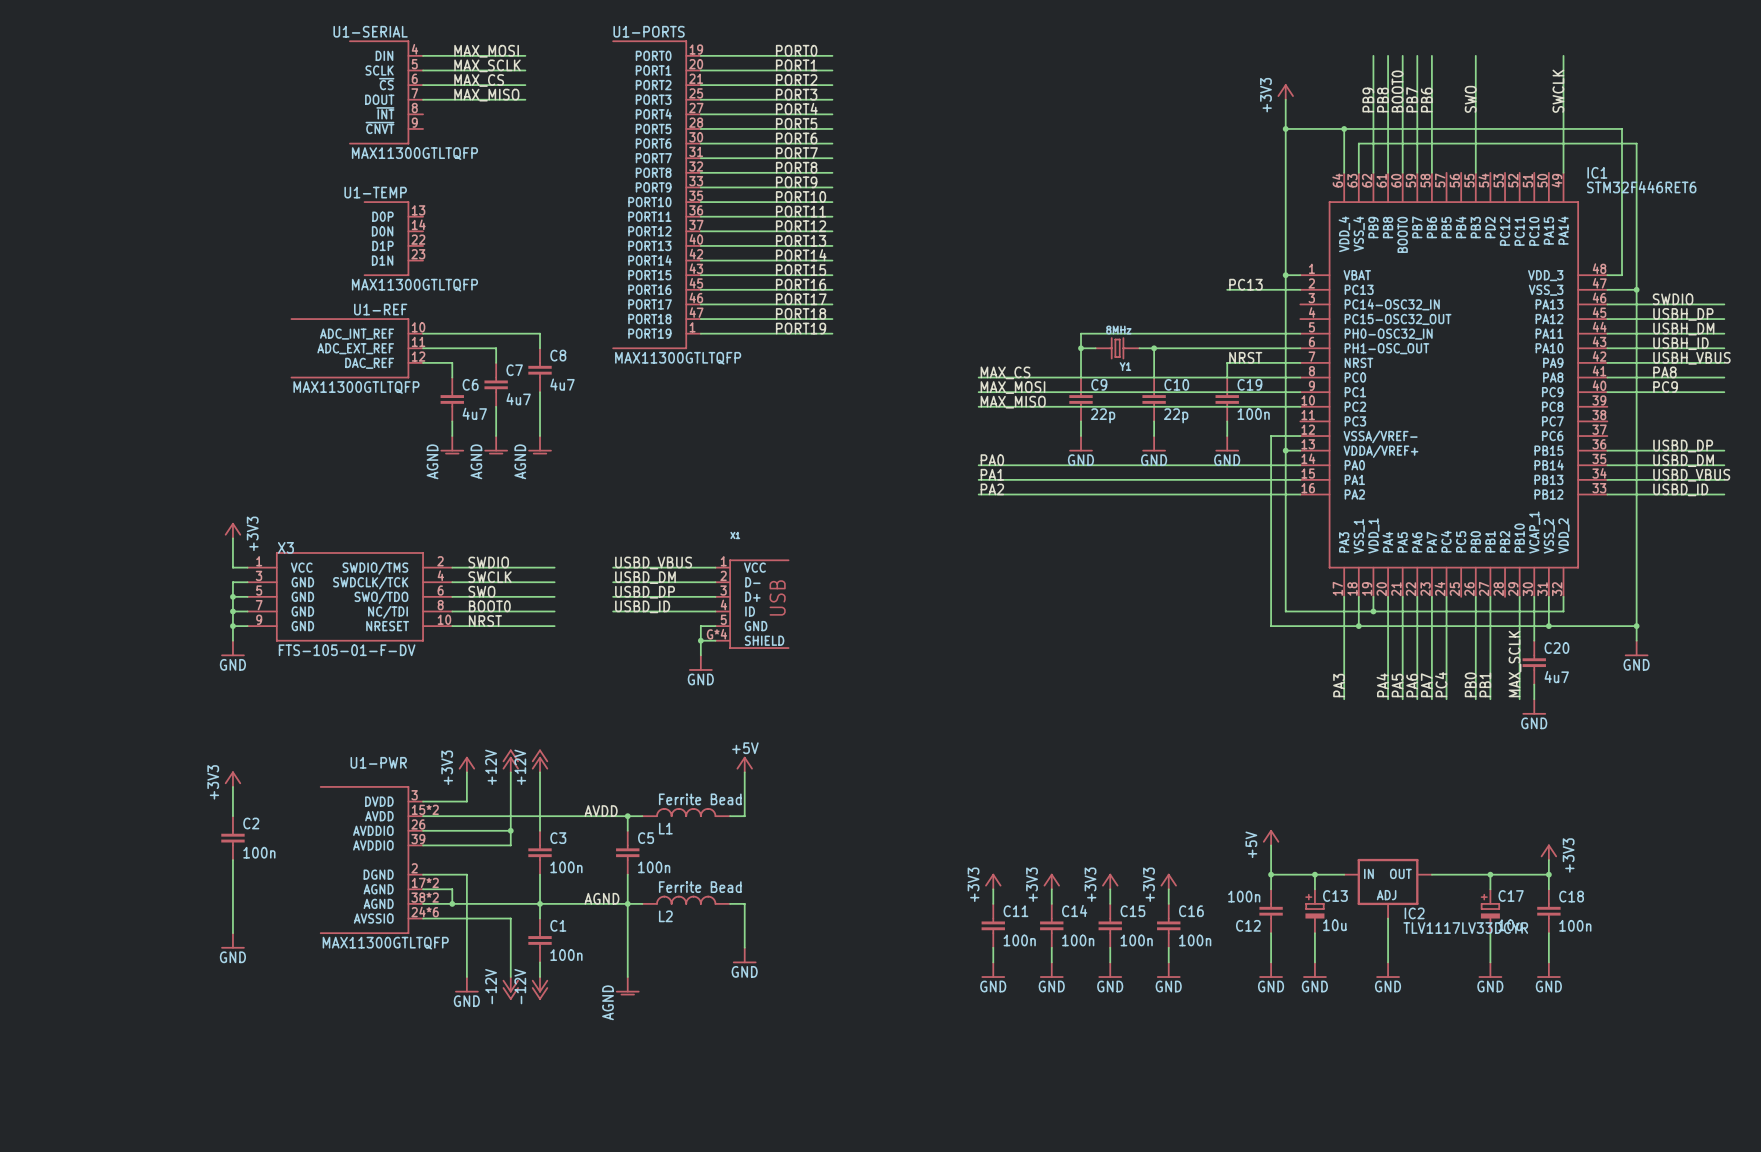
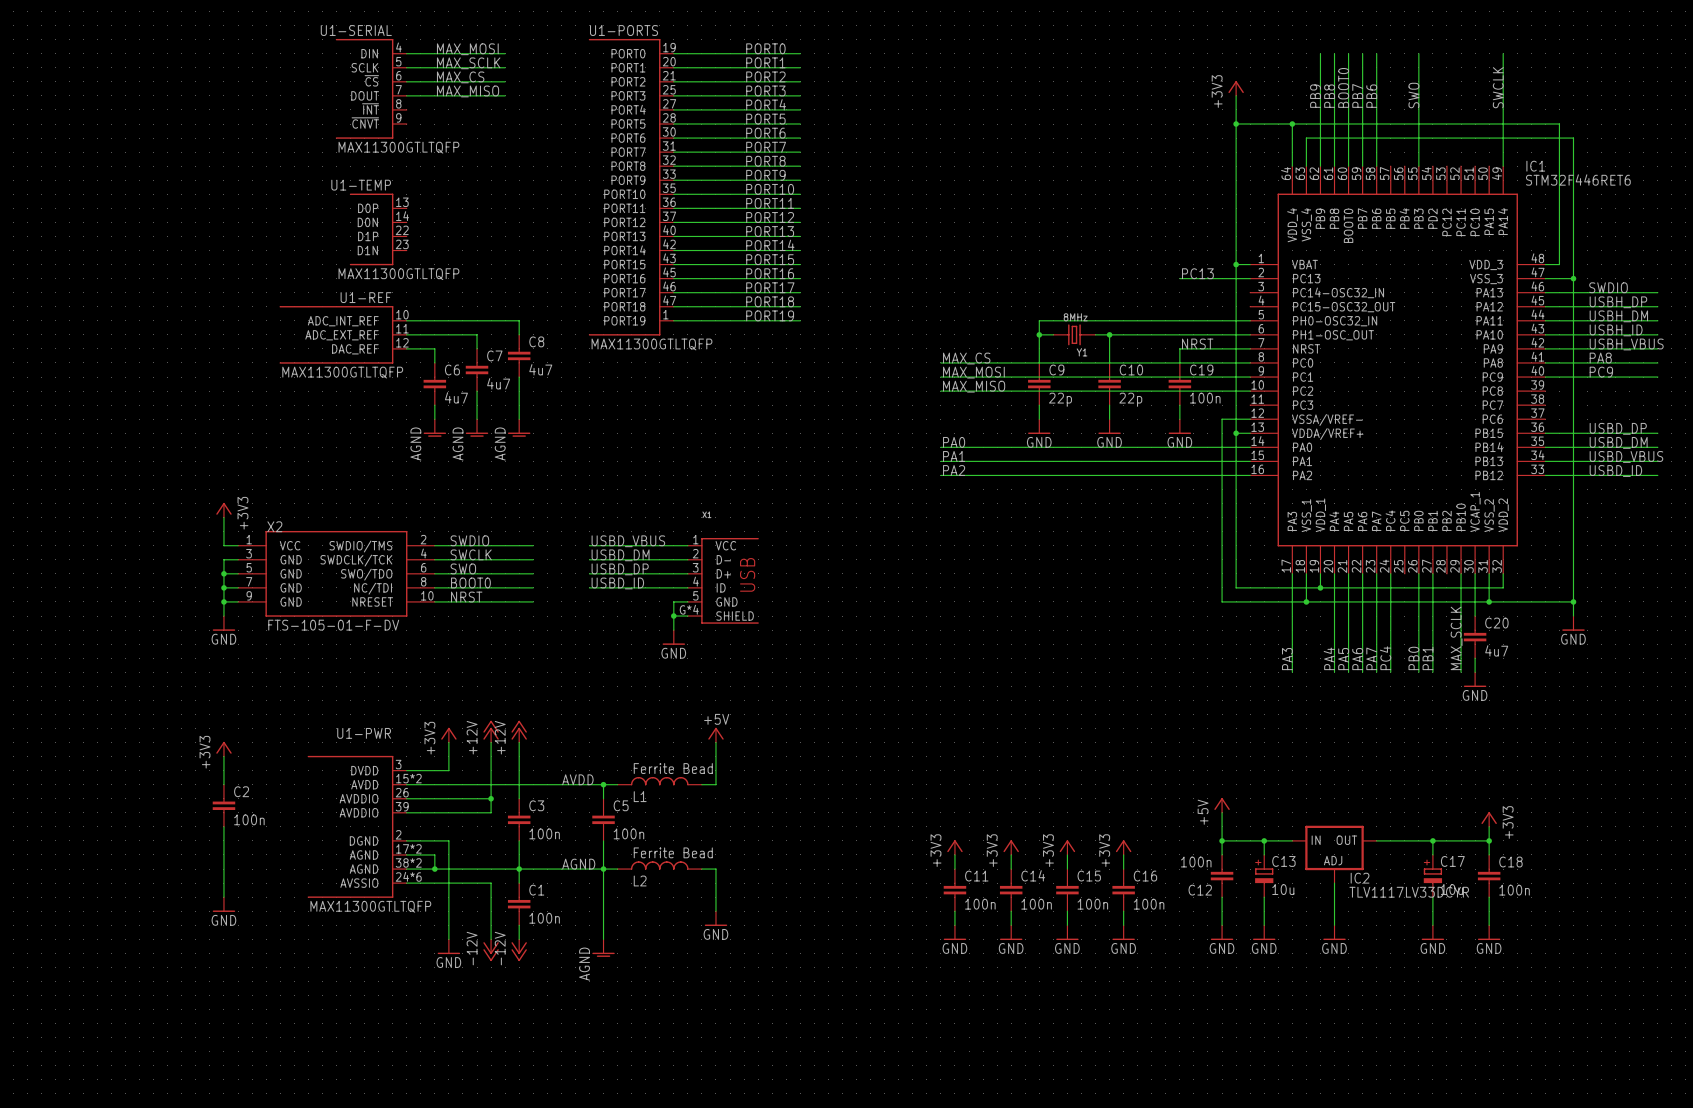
X3 name: X3 (285, 547) -> X2 (274, 526)

